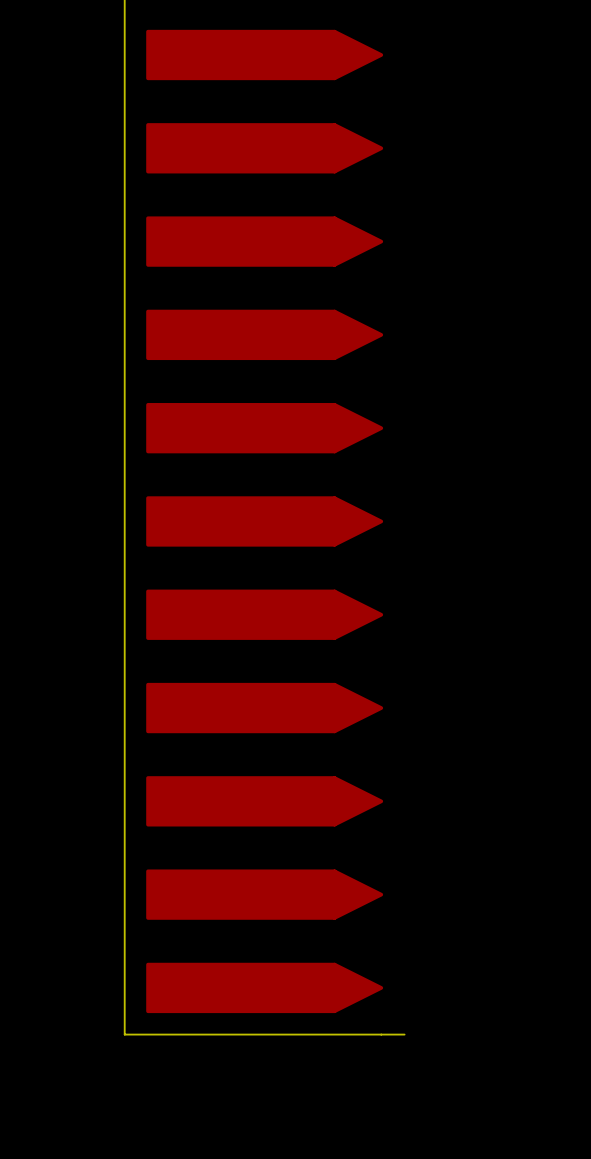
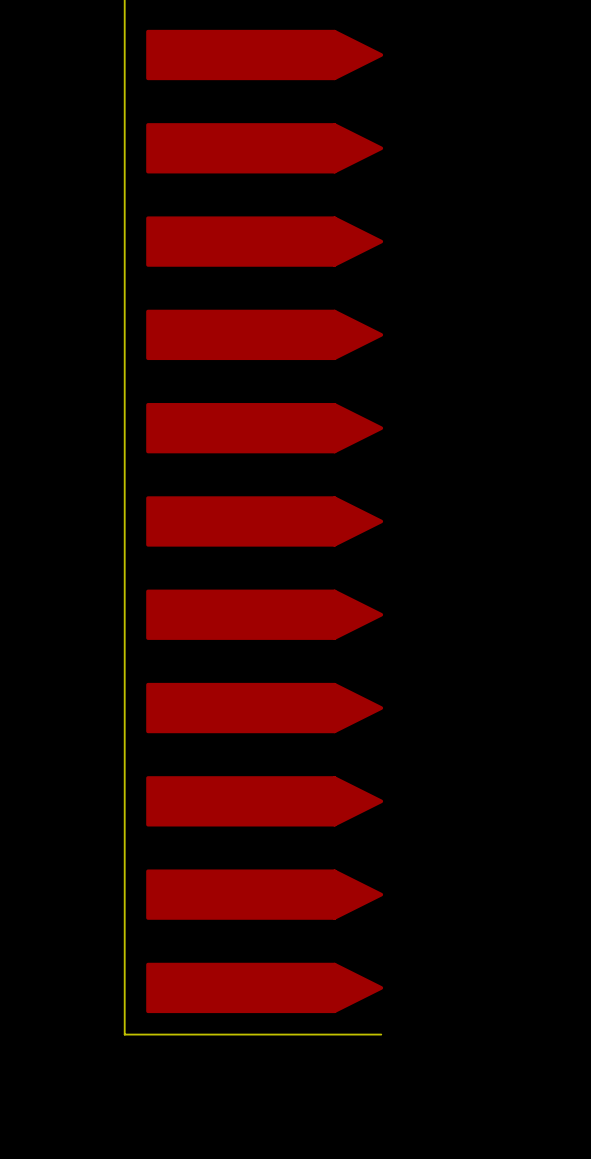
board edge: (381, 1034) (404, 1034) -> none

